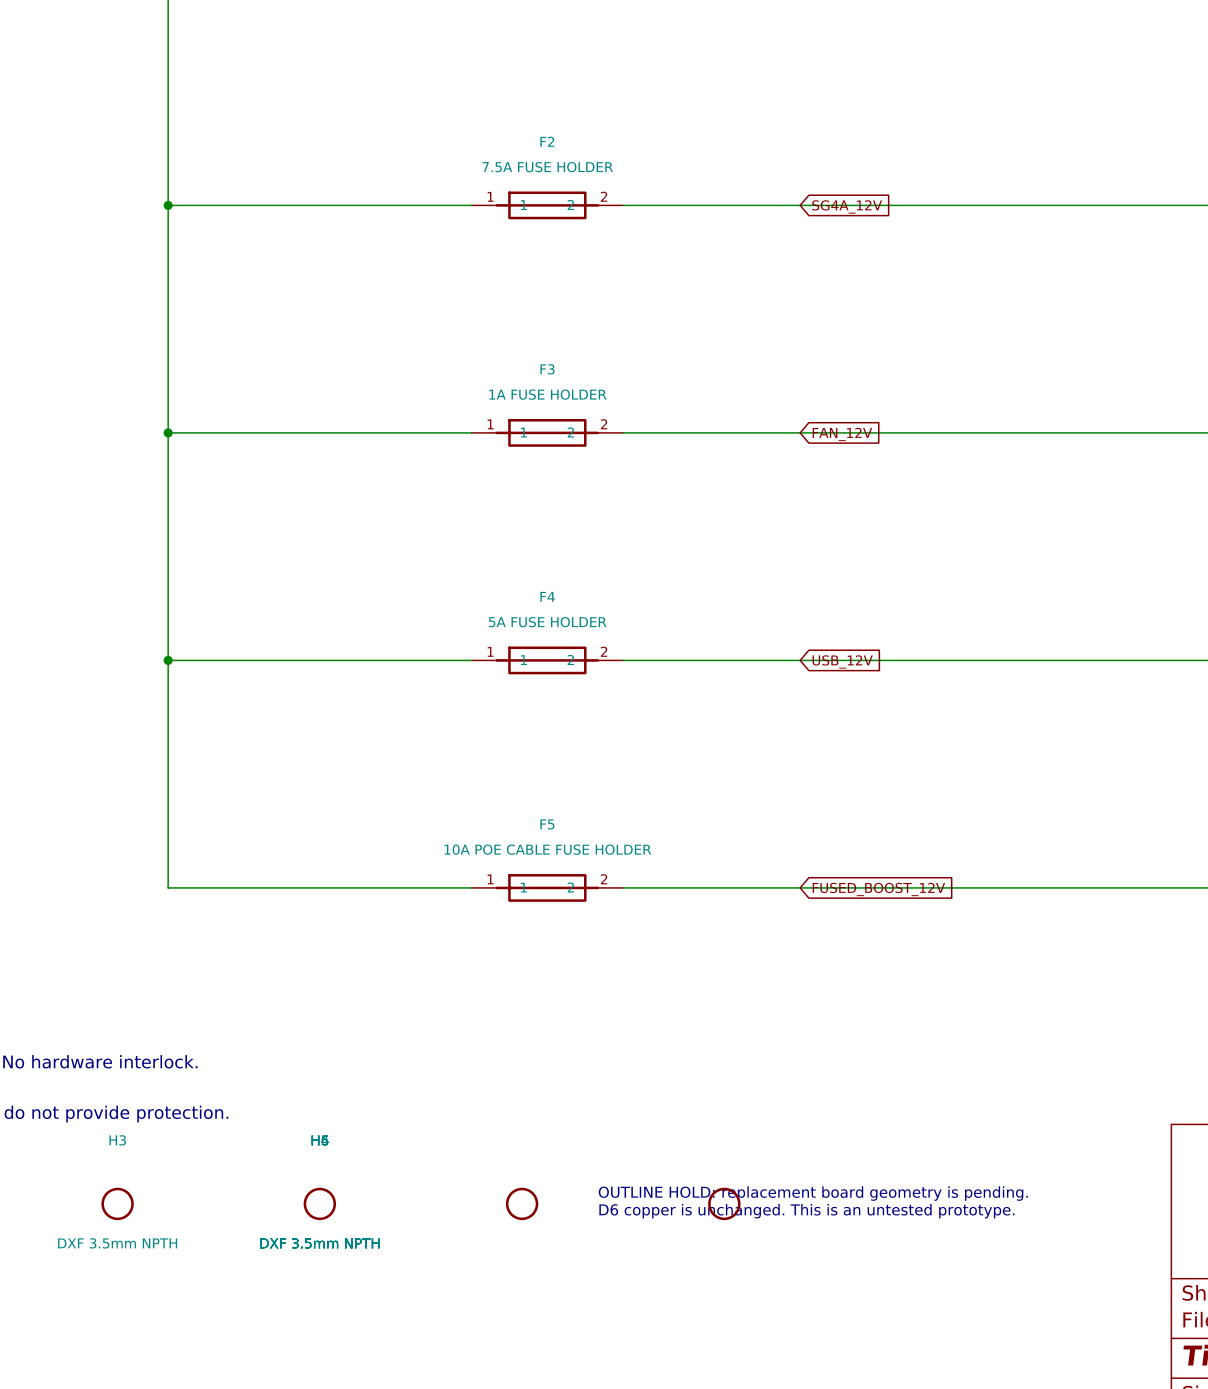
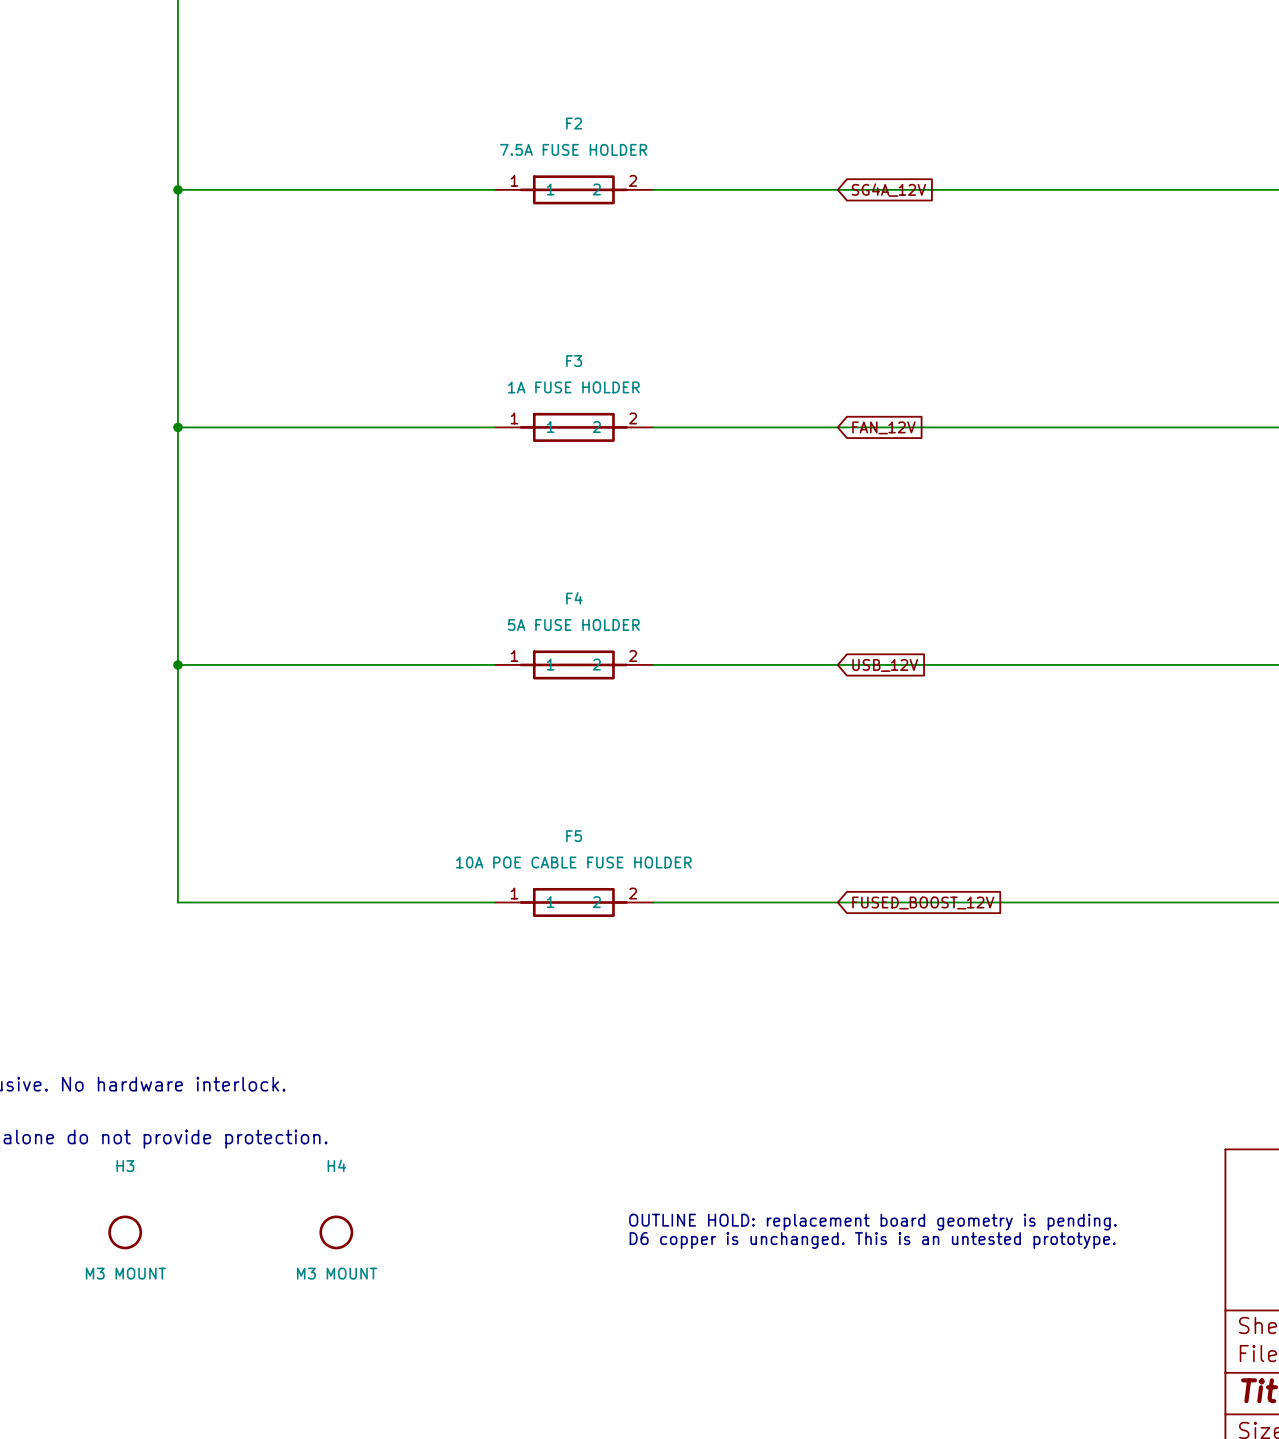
part: DXF 3.5mm NPTH (522, 1203) -> none
part: DXF 3.5mm NPTH (724, 1203) -> none
H3 value: DXF 3.5mm NPTH (117, 1243) -> M3 MOUNT (125, 1273)
H4 value: DXF 3.5mm NPTH (319, 1243) -> M3 MOUNT (337, 1273)

